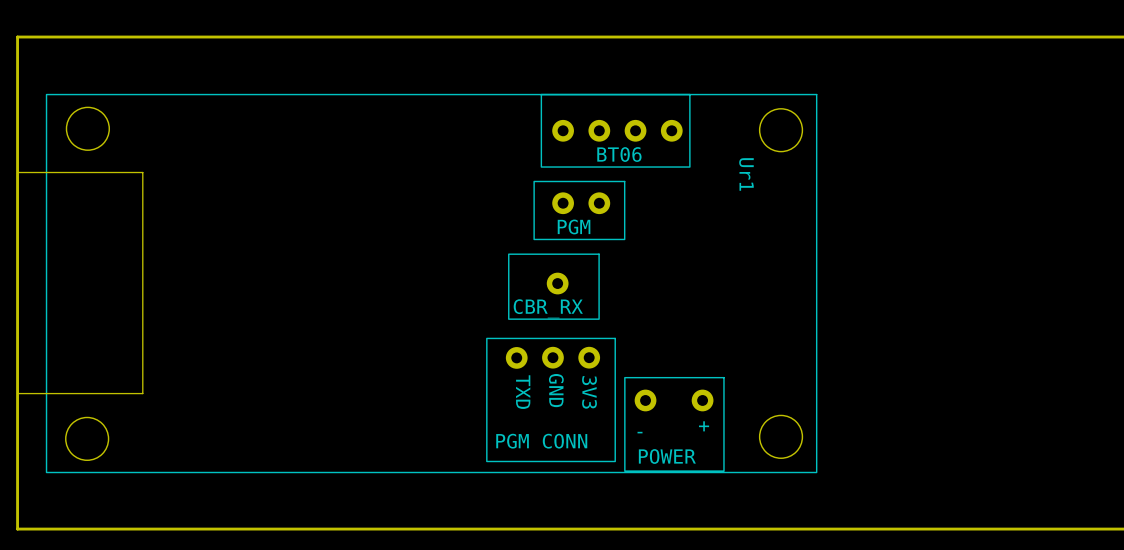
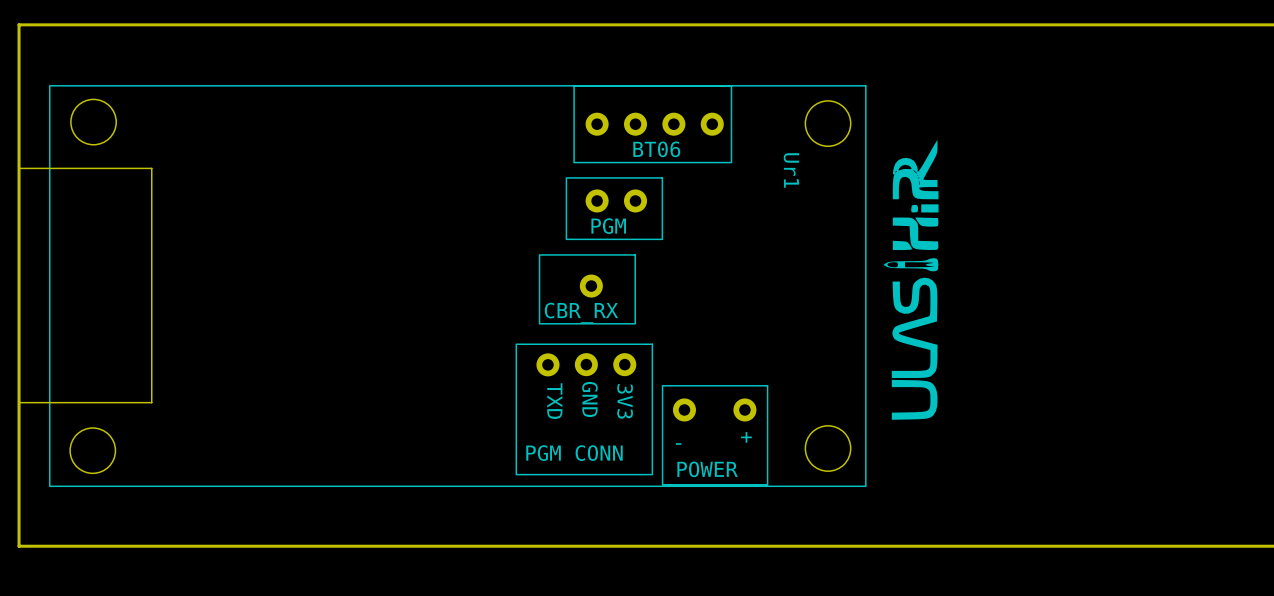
drawing: none -> [883, 139, 939, 420]

